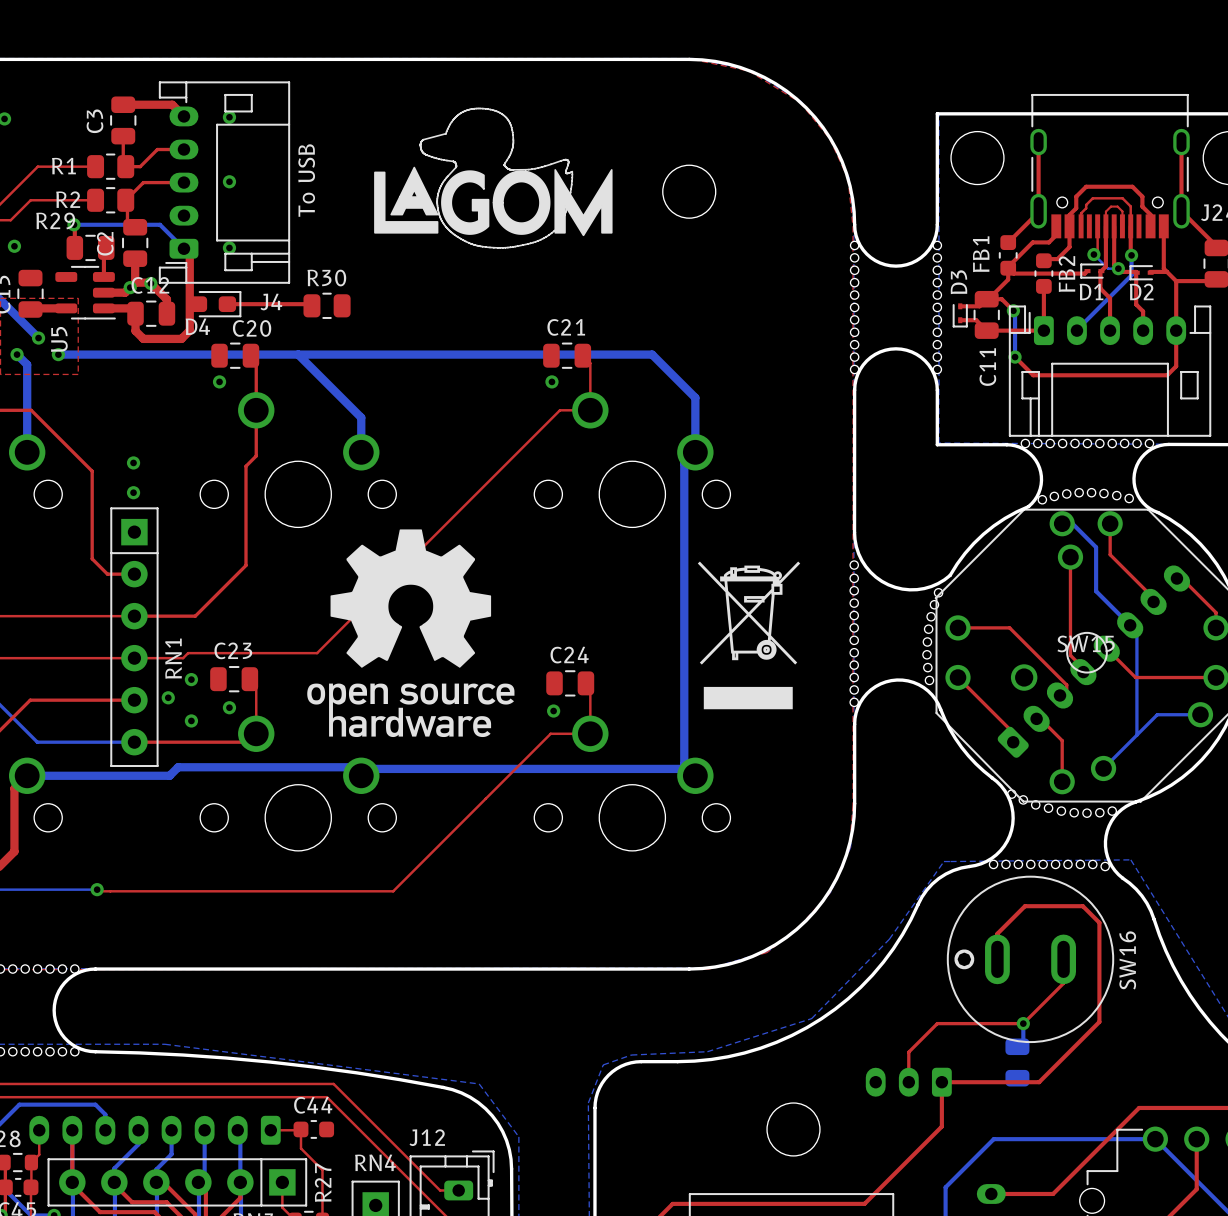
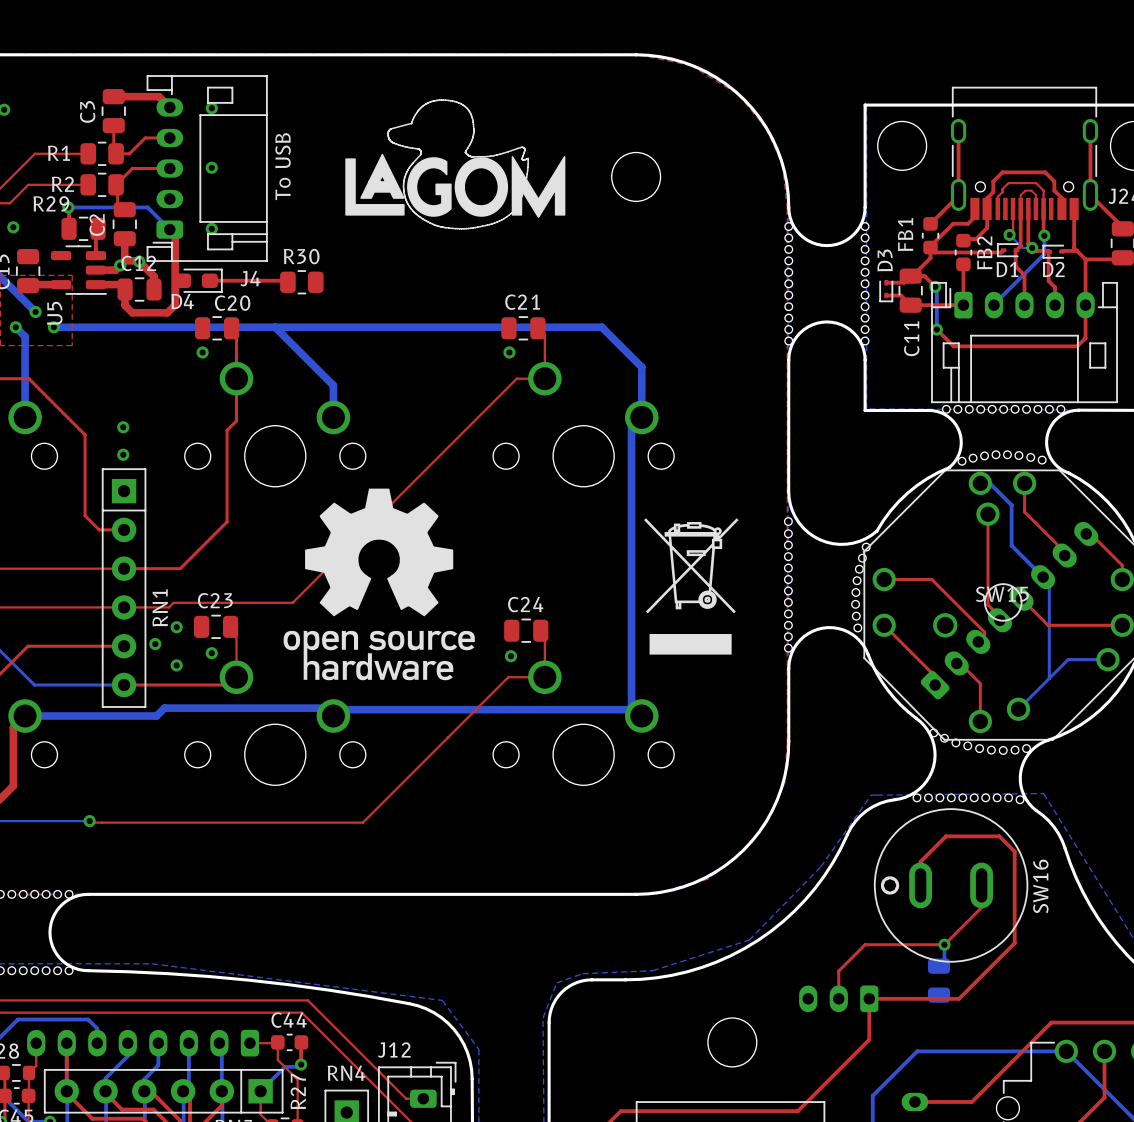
top track: none -> (301, 1042) (301, 1064)
bottom track: none -> (301, 1064) (298, 1066) (285, 1066) (260, 1091)
via: none -> (301, 1064)

